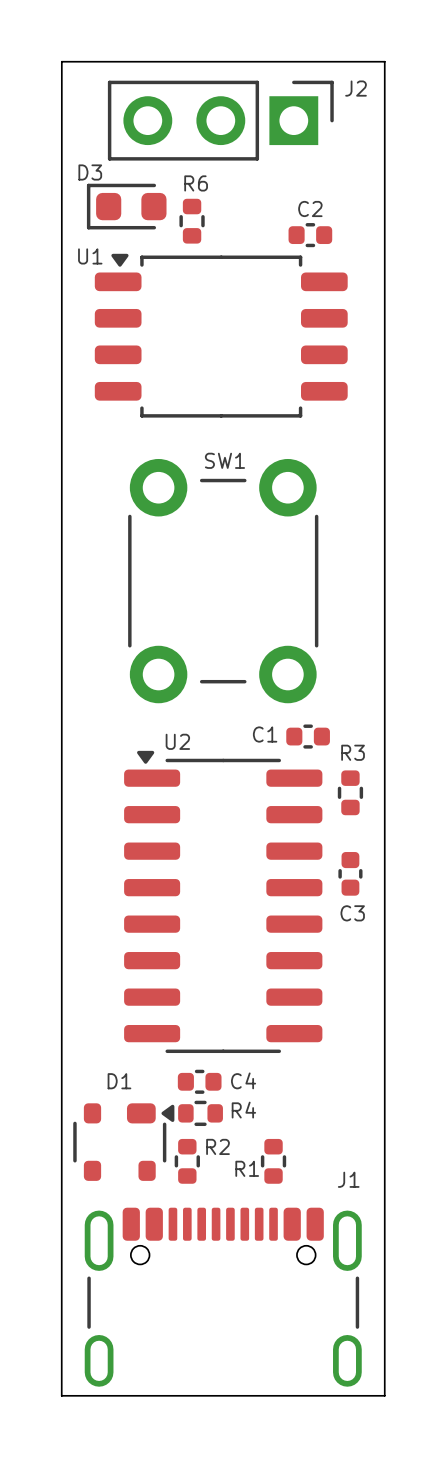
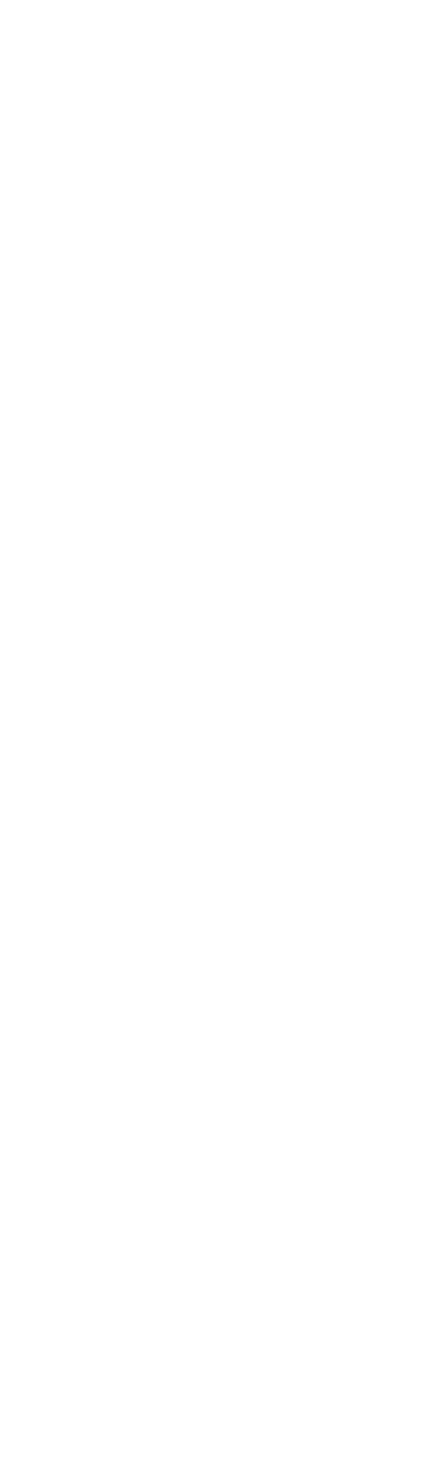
board edge: (61, 61) (384, 61) (384, 1395) (61, 1395) (61, 61) -> none
J2: (220, 120) -> none
D3: (126, 206) -> none
R6: (192, 221) -> none
C2: (310, 235) -> none
U1: (221, 335) -> none
SW1: (223, 581) -> none
C1: (308, 736) -> none
R3: (350, 792) -> none
C3: (350, 873) -> none
U2: (223, 901) -> none
C4: (199, 1081) -> none
R4: (200, 1113) -> none
D1: (123, 1142) -> none
R2: (187, 1161) -> none
R1: (273, 1161) -> none
J1: (223, 1297) -> none

